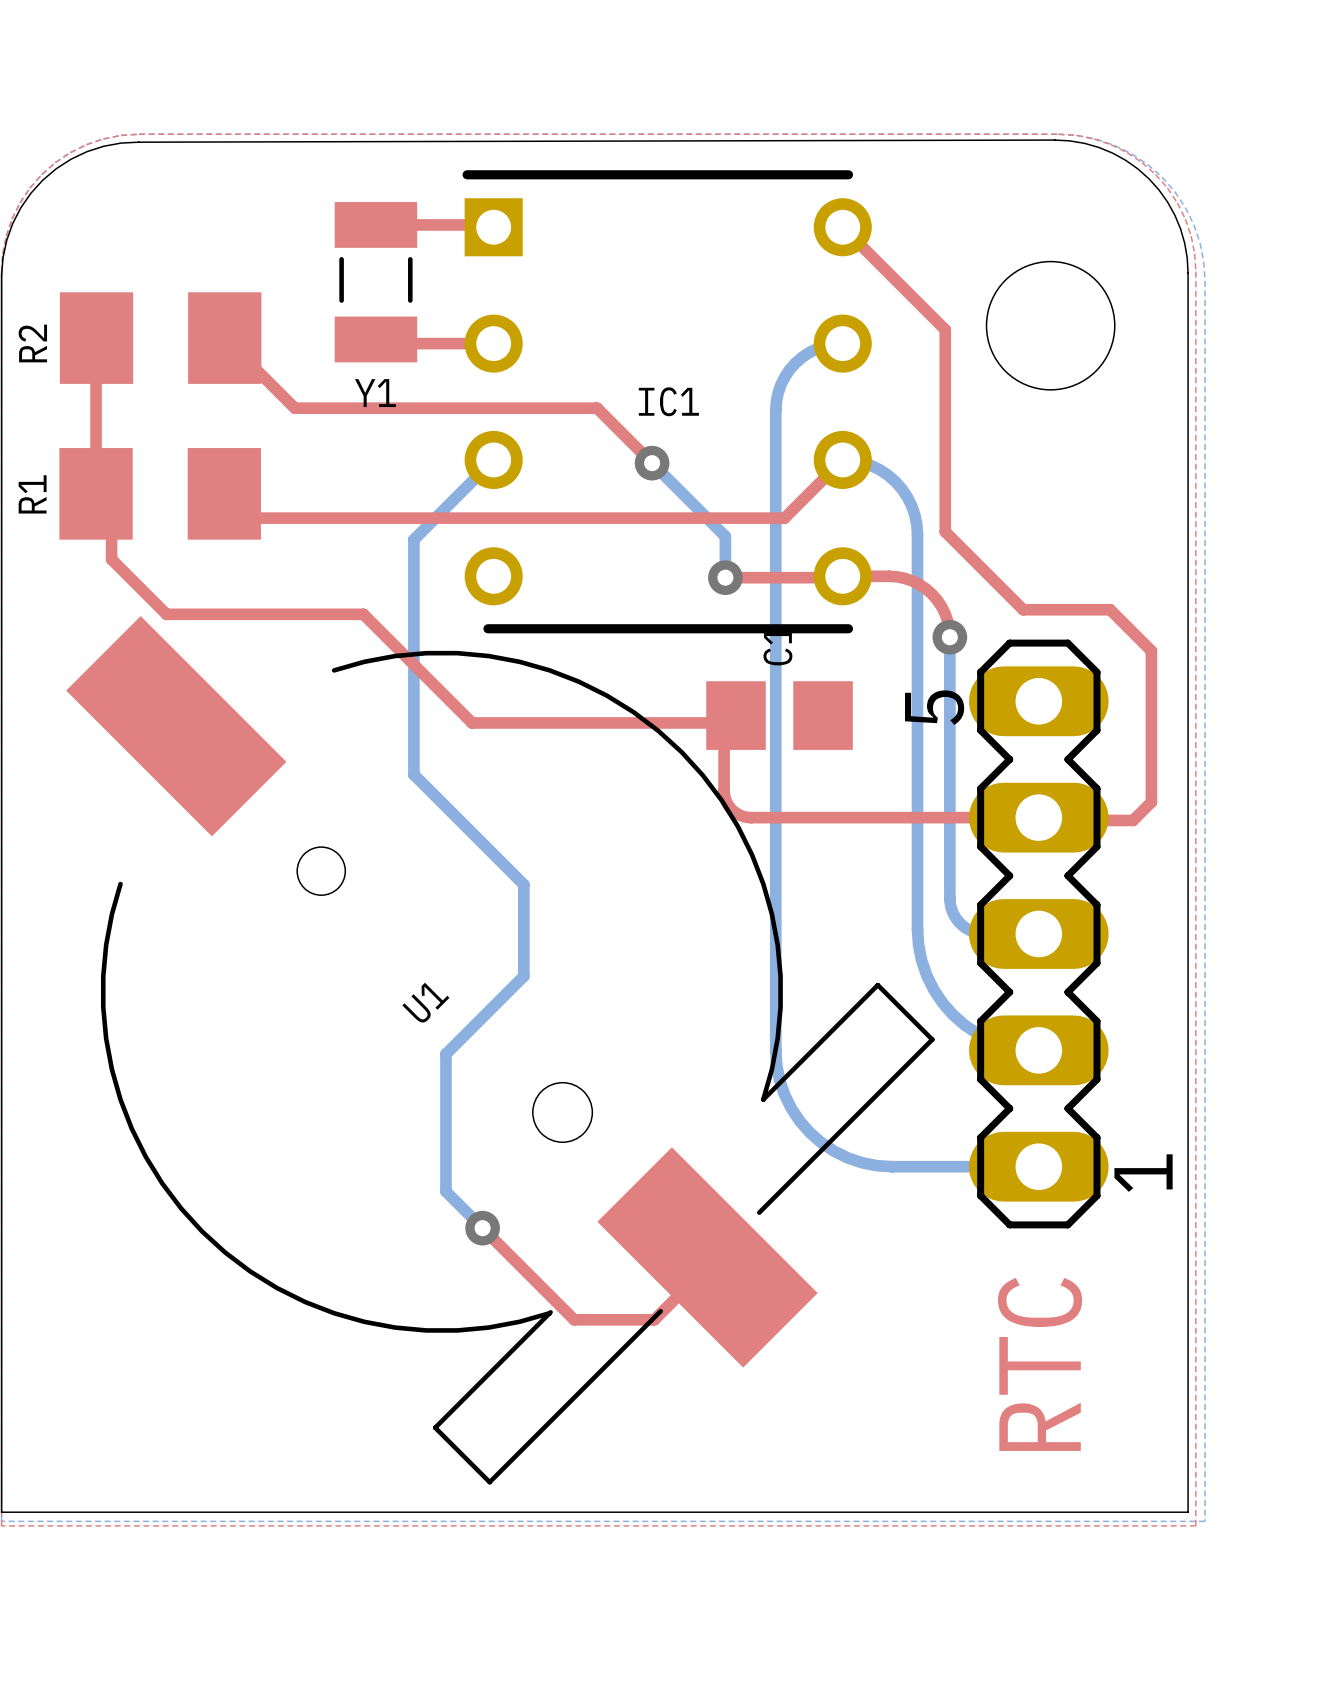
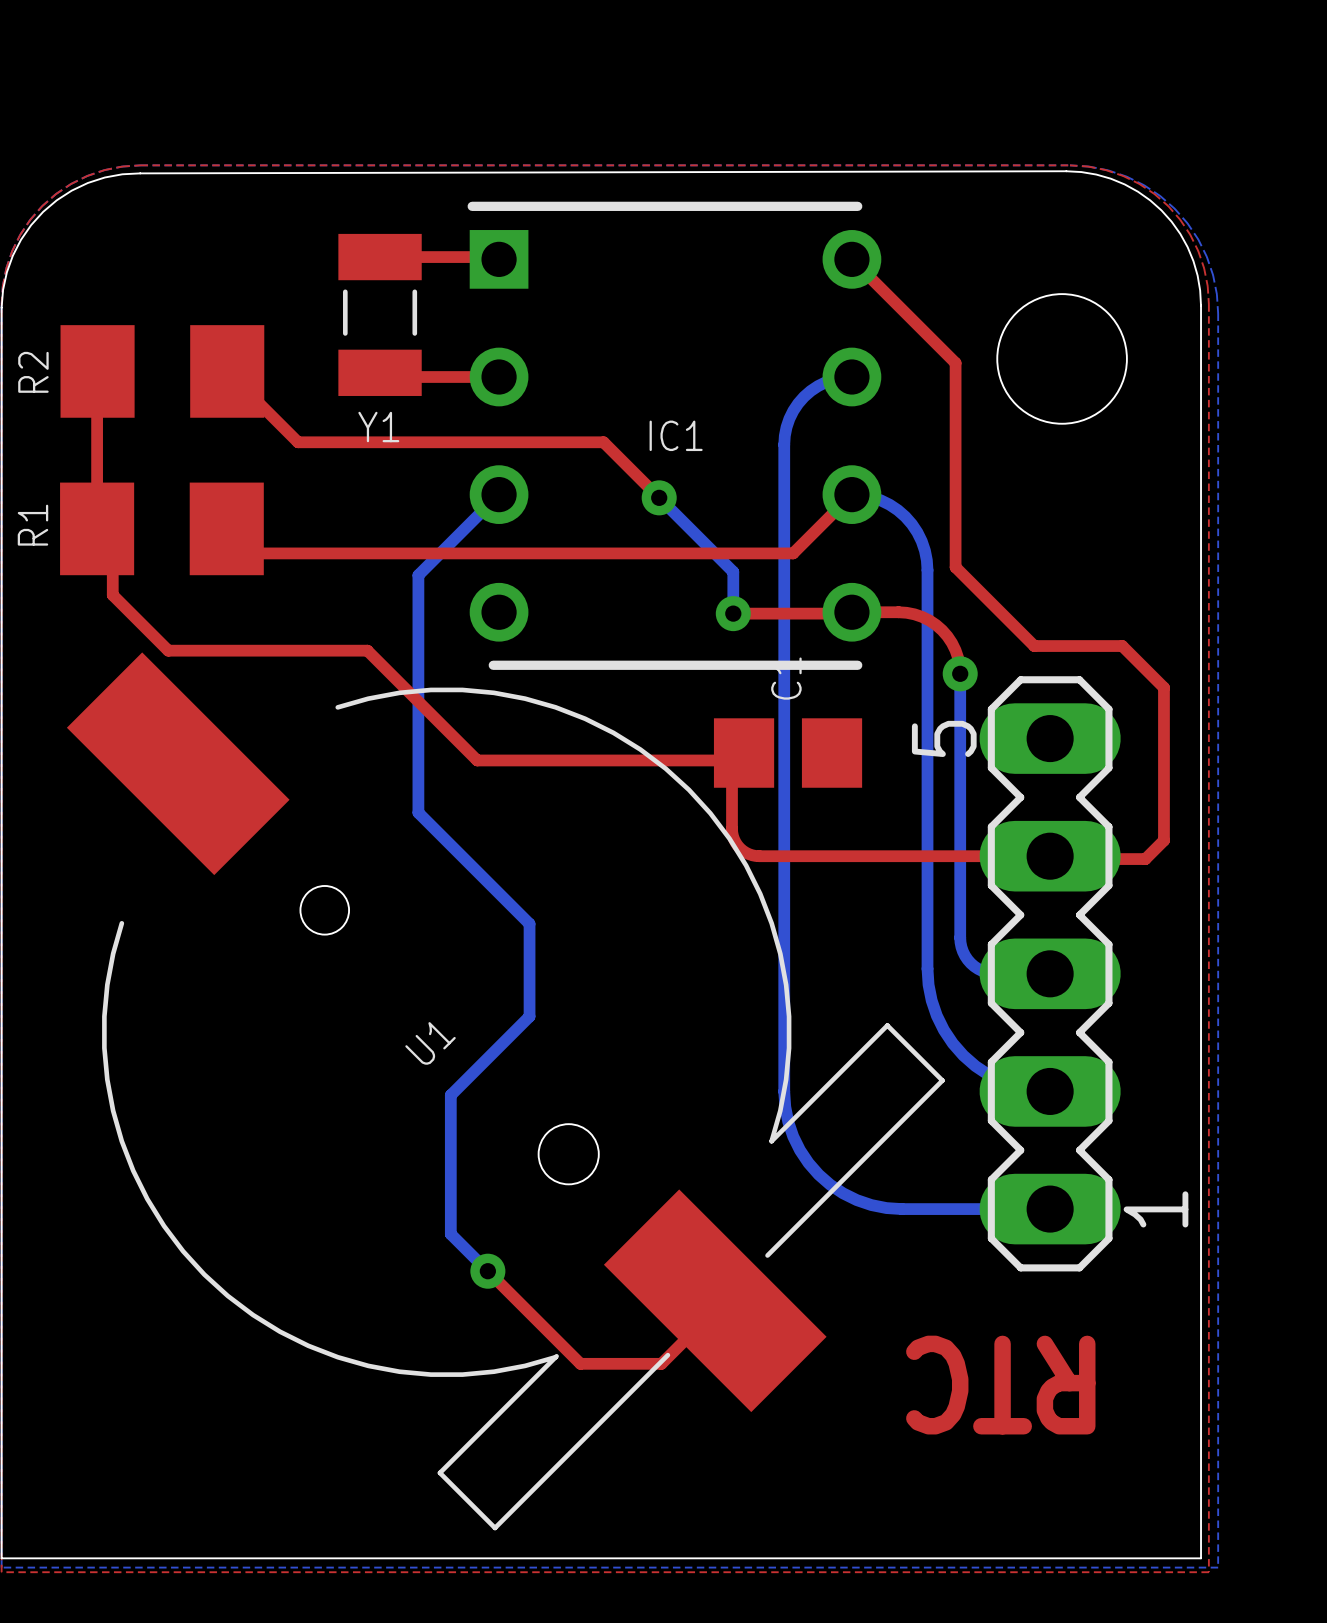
text rotation: 0° (1040, 1364) -> 90° counterclockwise (1000, 1385)

